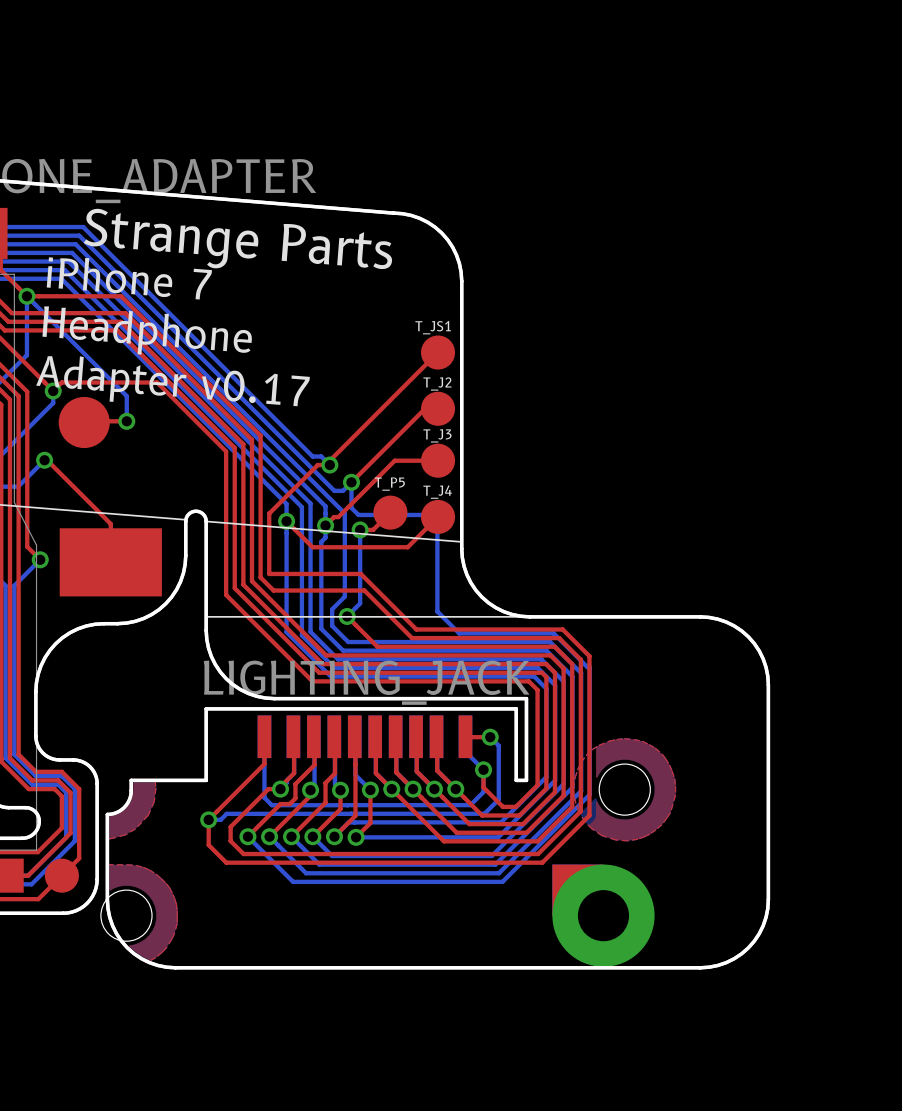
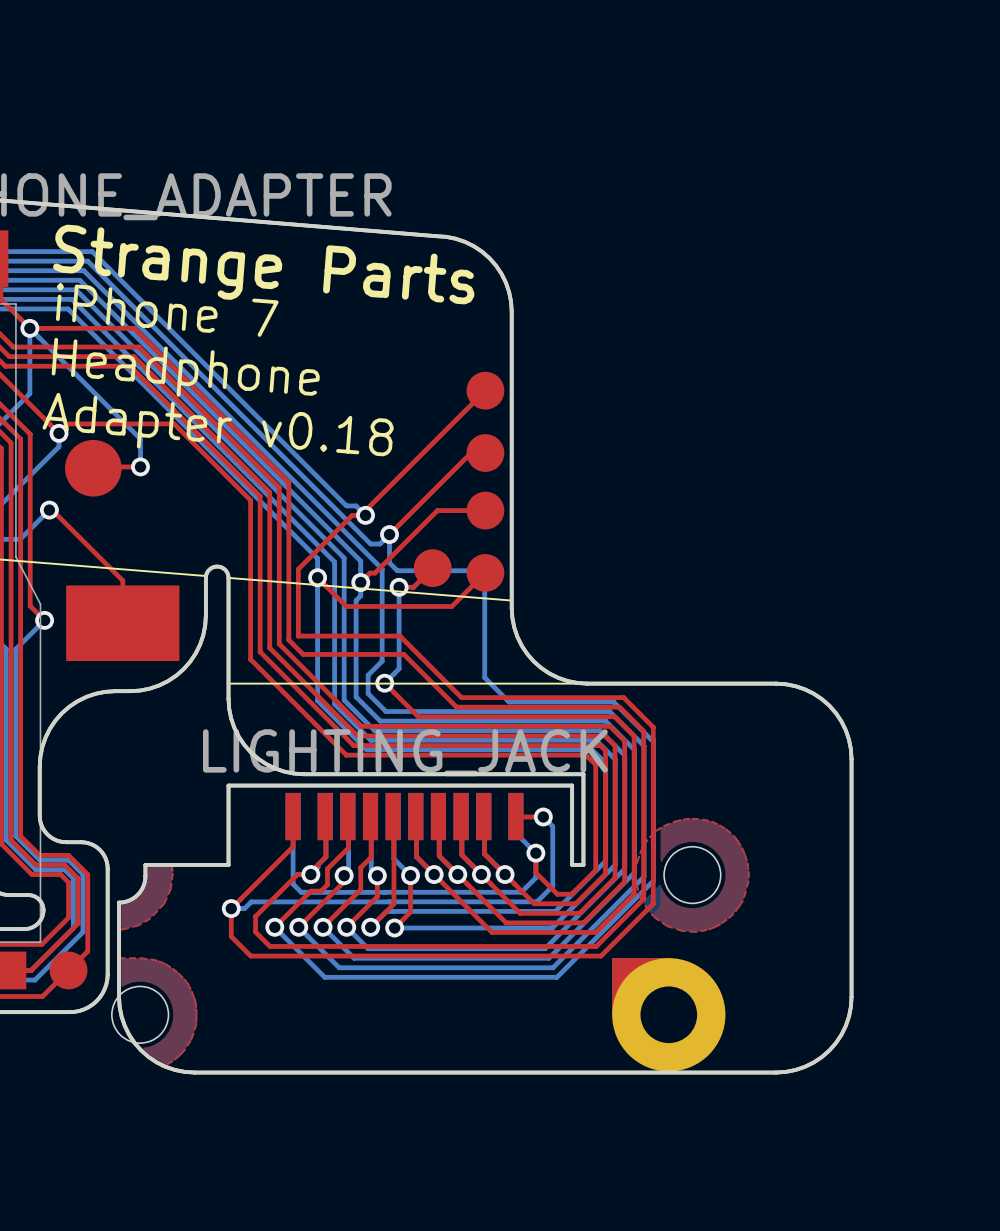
T_JS1 name: T_JS1 (433, 327) -> none
text: Adapter v0.17 (173, 381) -> Adapter v0.18 (218, 424)
T_J2 name: T_J2 (437, 383) -> none
T_J3 name: T_J3 (437, 435) -> none
T_P5 name: T_P5 (389, 484) -> none
T_J4 name: T_J4 (437, 492) -> none

